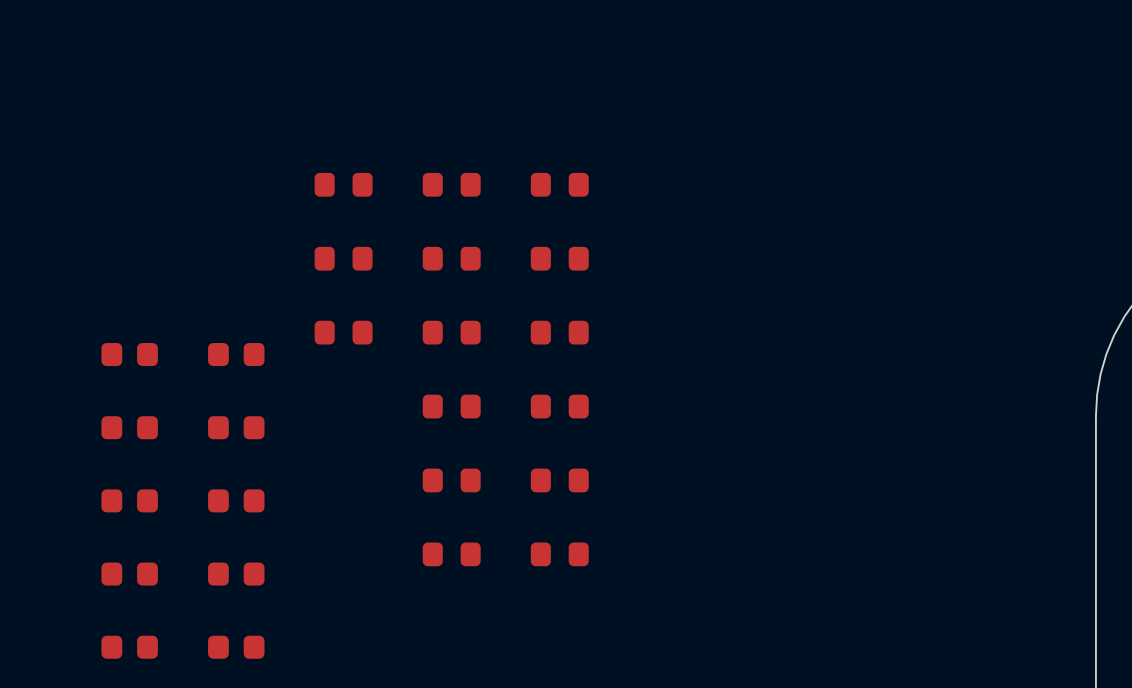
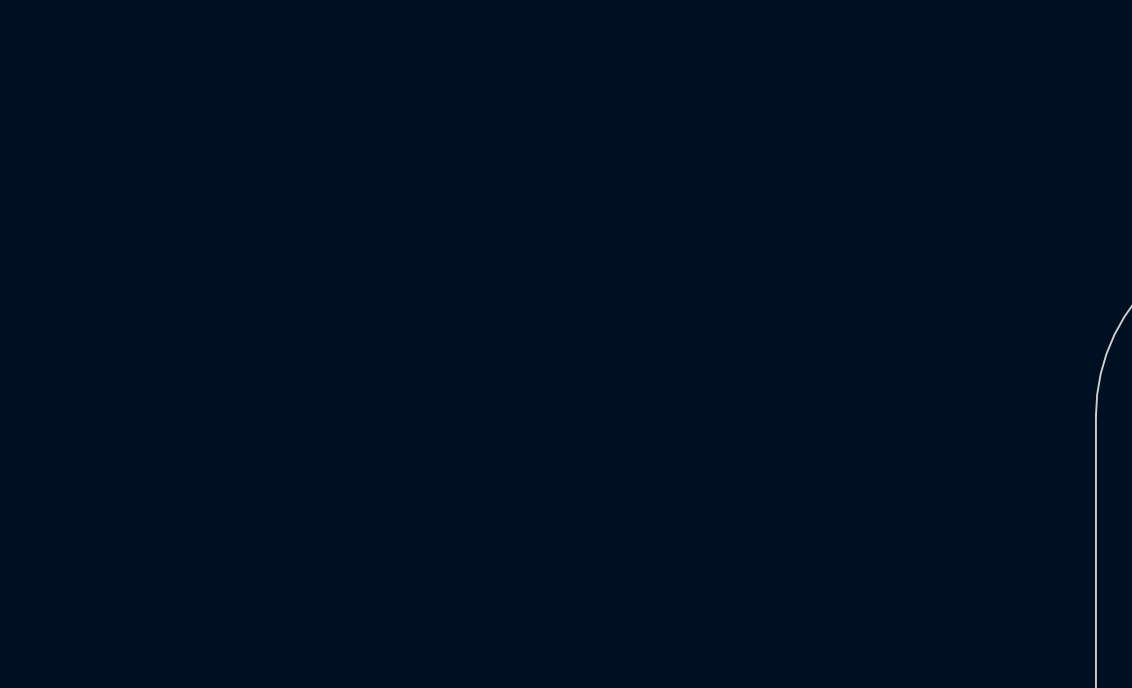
part: (343, 184) -> none
part: (451, 184) -> none
part: (559, 184) -> none
part: (343, 258) -> none
part: (451, 258) -> none
part: (559, 258) -> none
part: (343, 332) -> none
part: (451, 332) -> none
part: (559, 332) -> none
part: (129, 354) -> none
part: (236, 354) -> none
part: (451, 406) -> none
part: (559, 406) -> none
part: (129, 427) -> none
part: (236, 427) -> none
part: (451, 480) -> none
part: (559, 480) -> none
part: (129, 500) -> none
part: (236, 500) -> none
part: (451, 554) -> none
part: (559, 554) -> none
part: (129, 574) -> none
part: (236, 574) -> none
part: (129, 647) -> none
part: (236, 647) -> none

